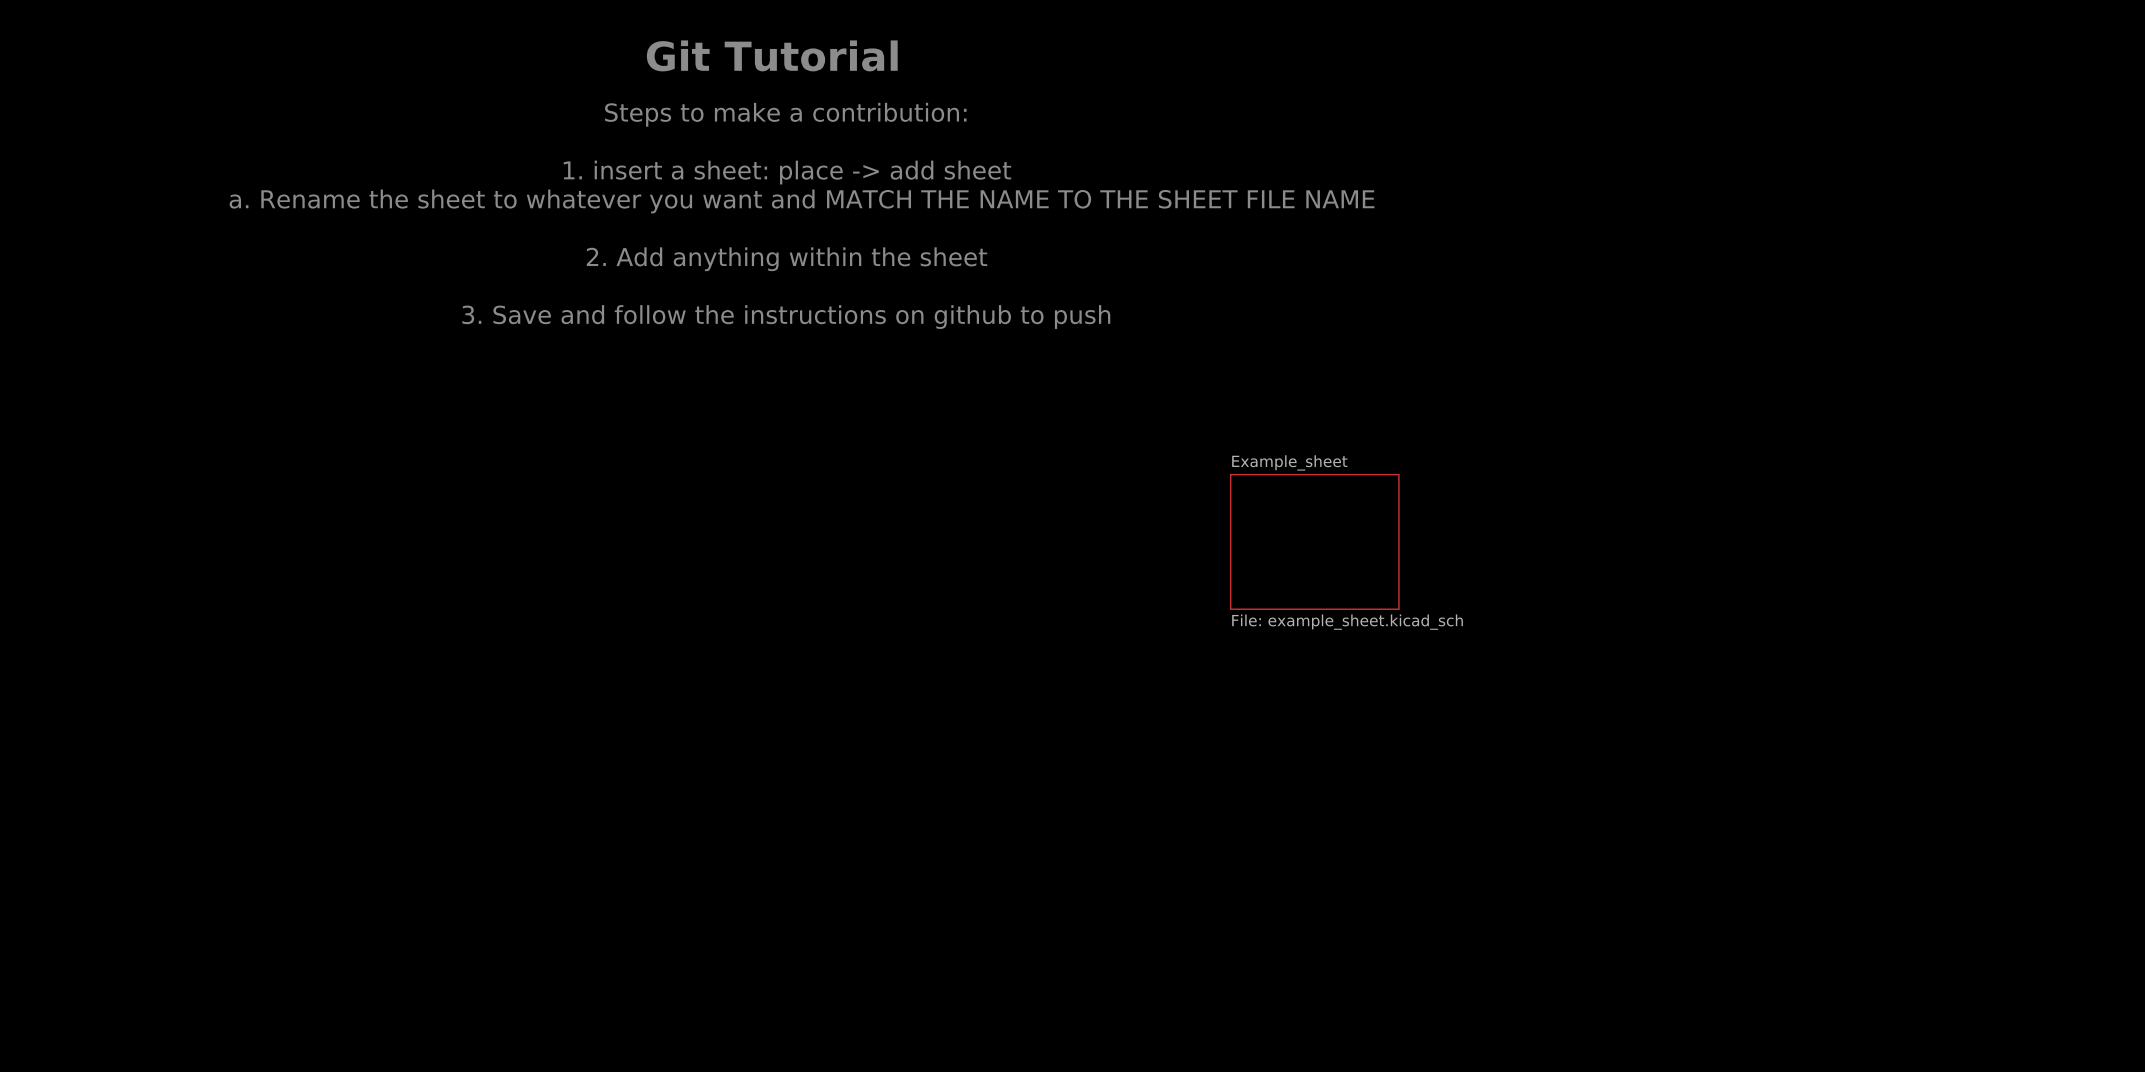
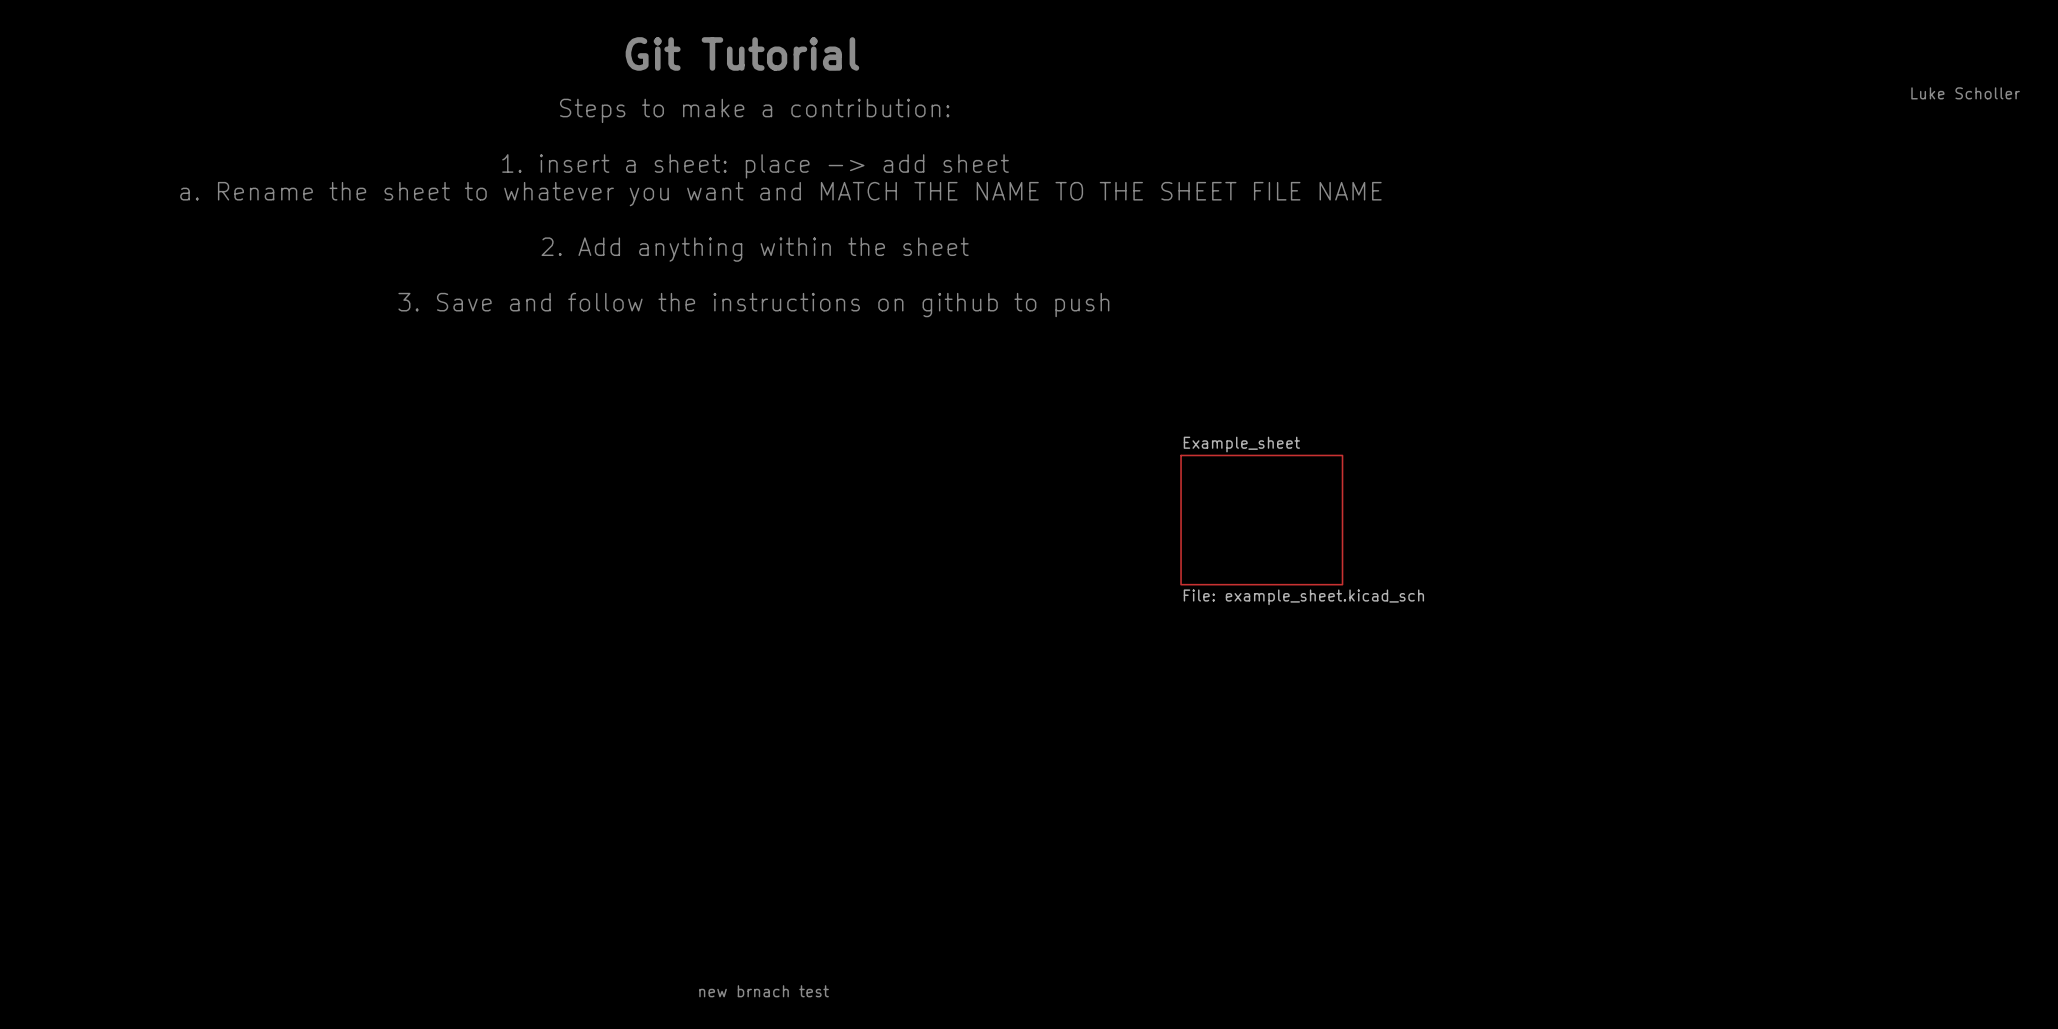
text: none -> Luke Scholler (1965, 93)
text: none -> new brnach test (764, 991)

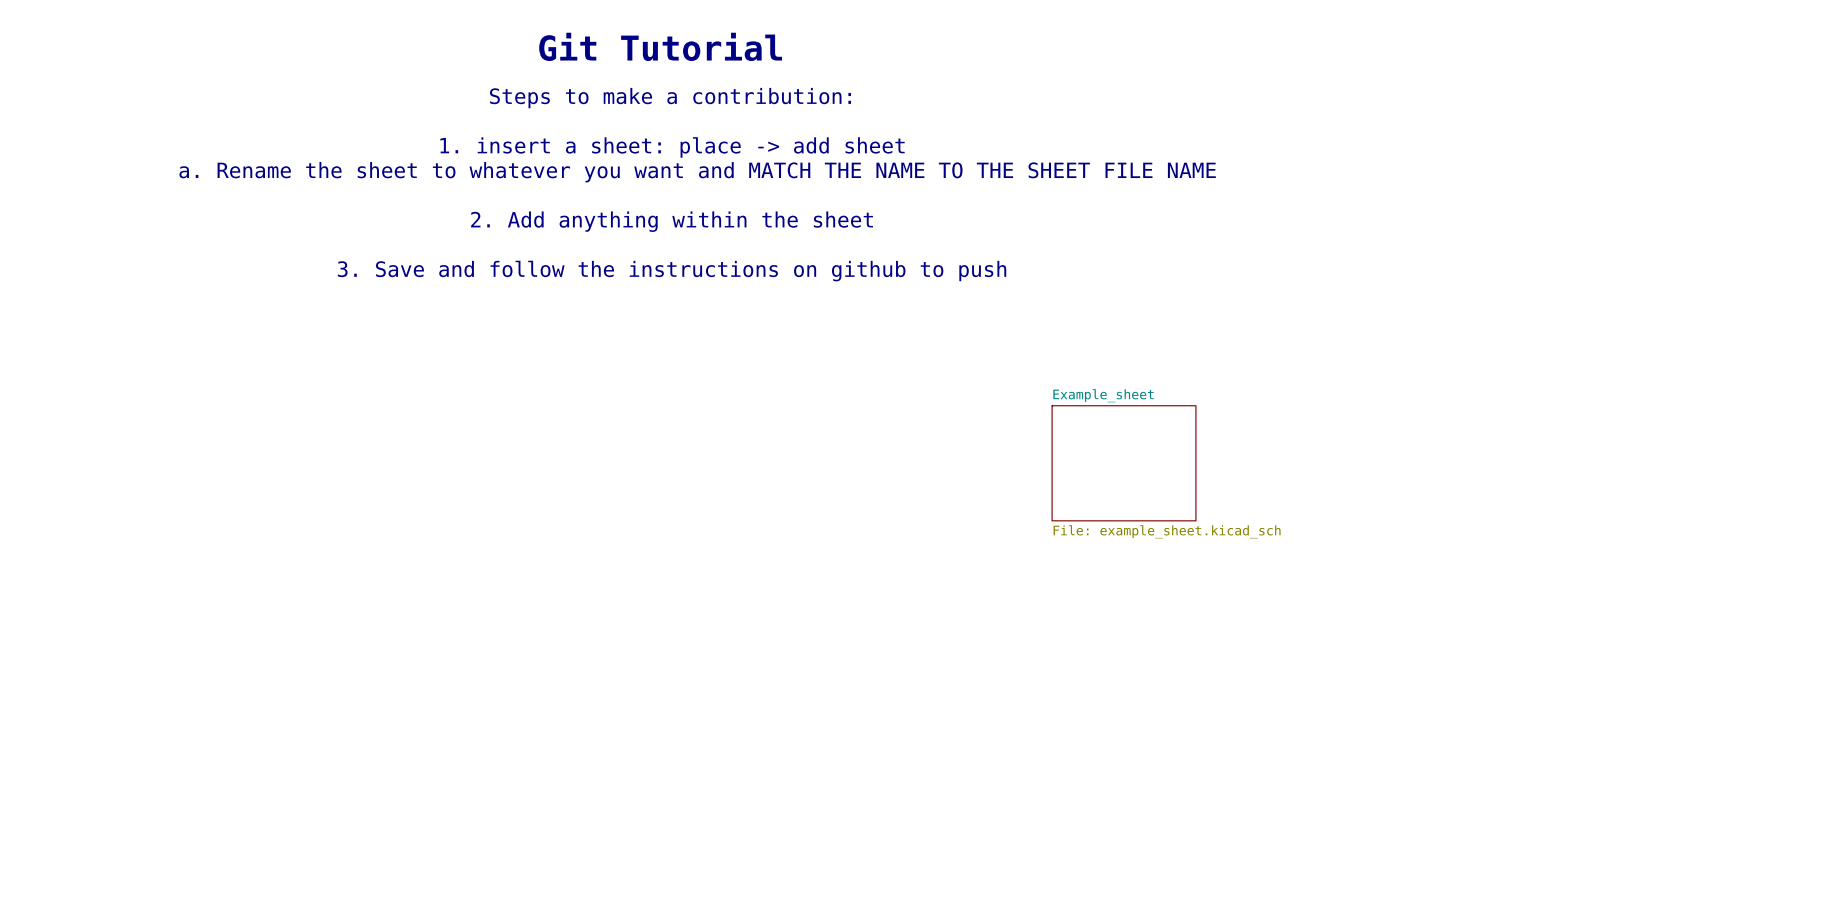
text: Luke Scholler (1965, 93) -> none
text: new brnach test (764, 991) -> none

